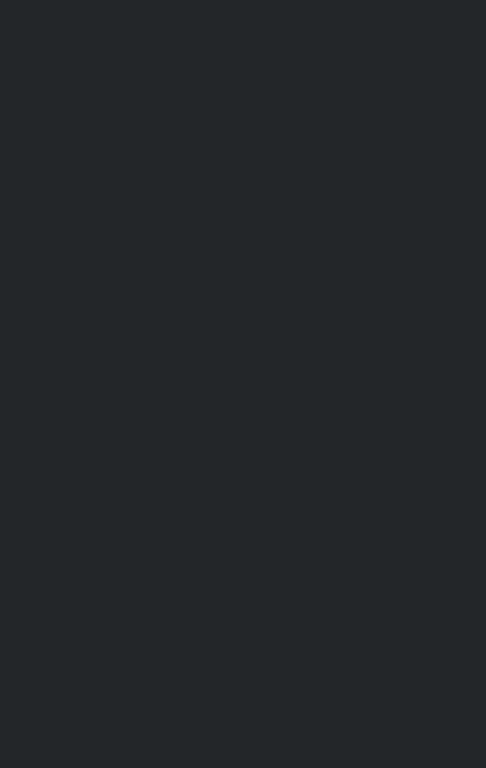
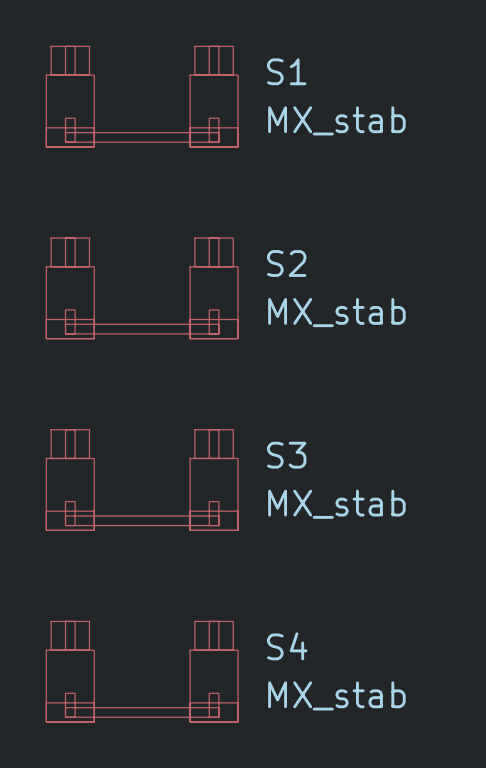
S1: none -> MX_stab (142, 96)
S2: none -> MX_stab (142, 288)
S3: none -> MX_stab (142, 480)
S4: none -> MX_stab (142, 671)

